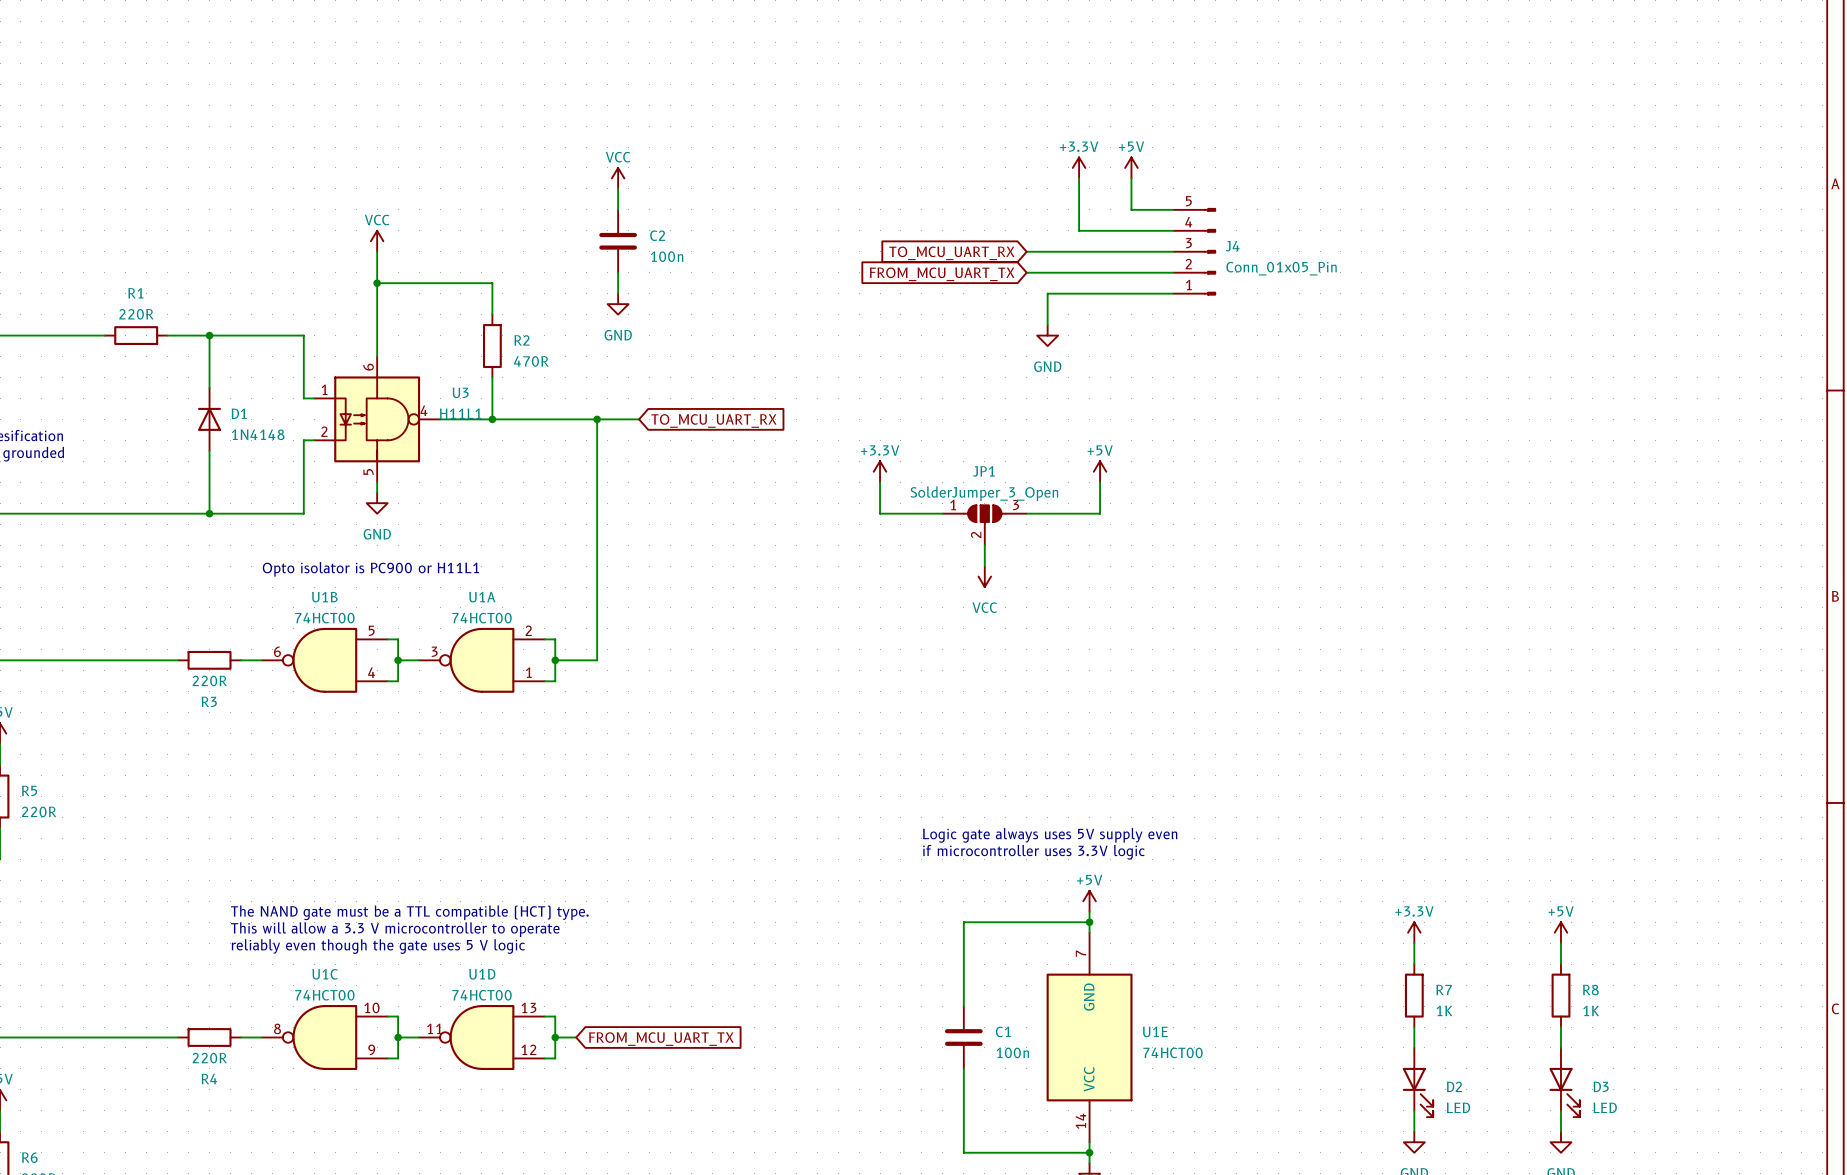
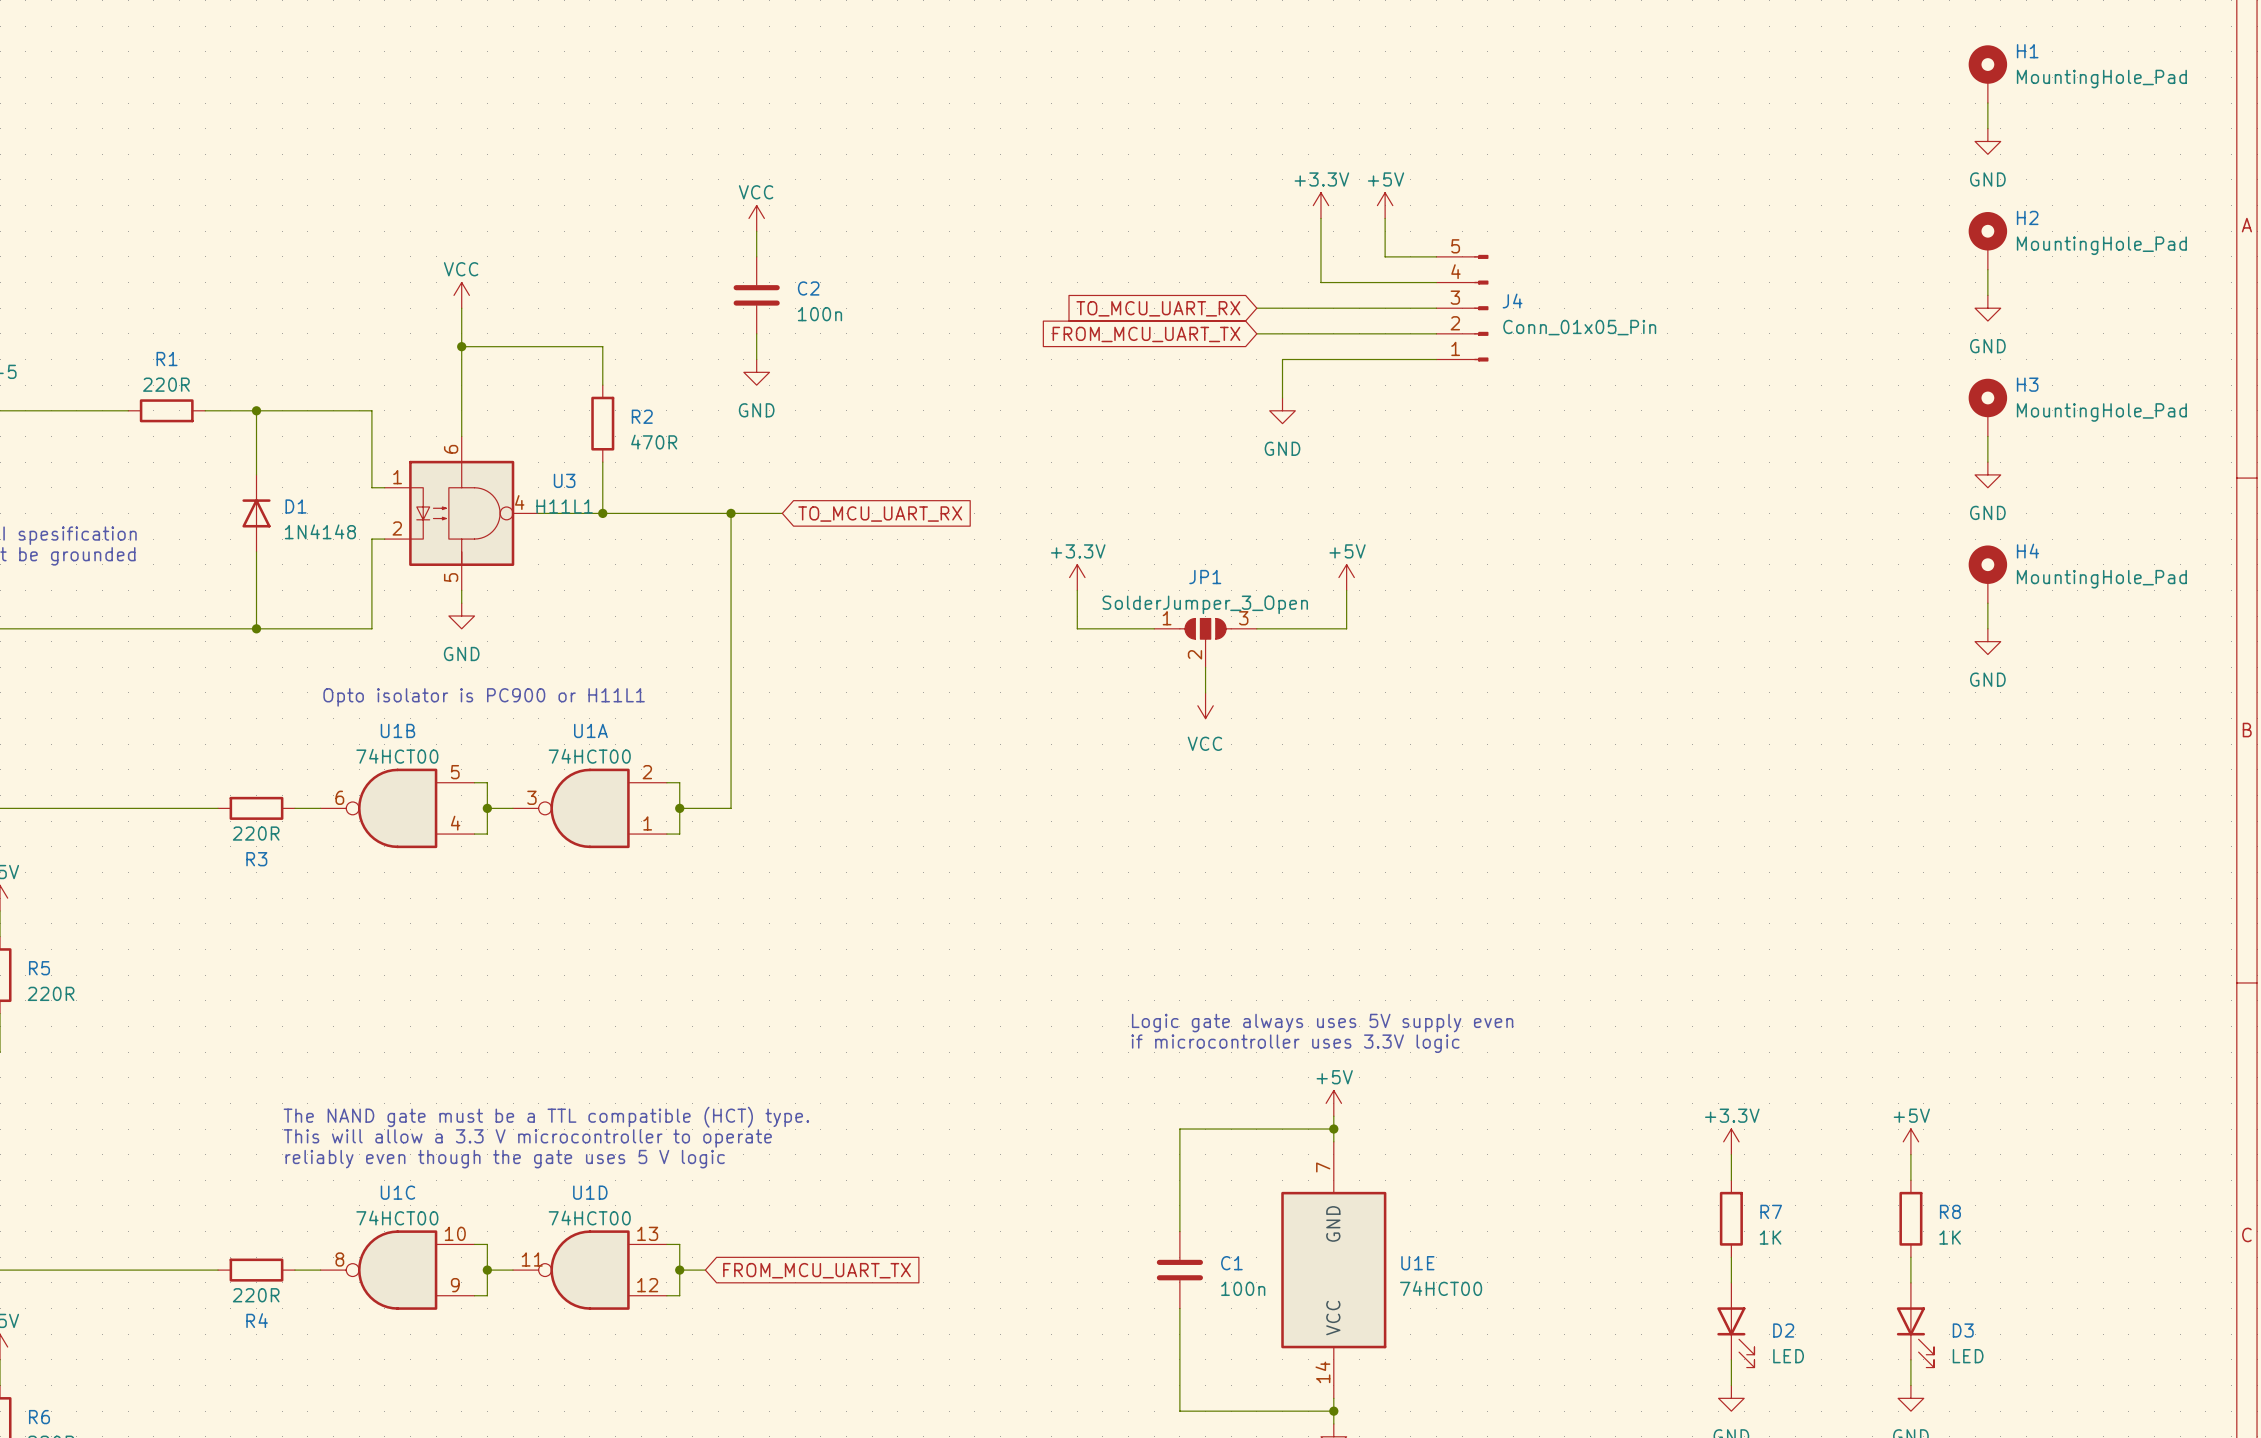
H1: none -> MountingHole_Pad (1987, 74)
wire: none -> (1987, 103) (1987, 128)
power symbol: none -> GND (1987, 141)
H2: none -> MountingHole_Pad (1987, 240)
wire: none -> (1987, 269) (1987, 295)
power symbol: none -> GND (1987, 308)
H3: none -> MountingHole_Pad (1987, 407)
wire: none -> (1987, 436) (1987, 462)
power symbol: none -> GND (1987, 474)
H4: none -> MountingHole_Pad (1987, 574)
wire: none -> (1987, 603) (1987, 628)
power symbol: none -> GND (1987, 641)

